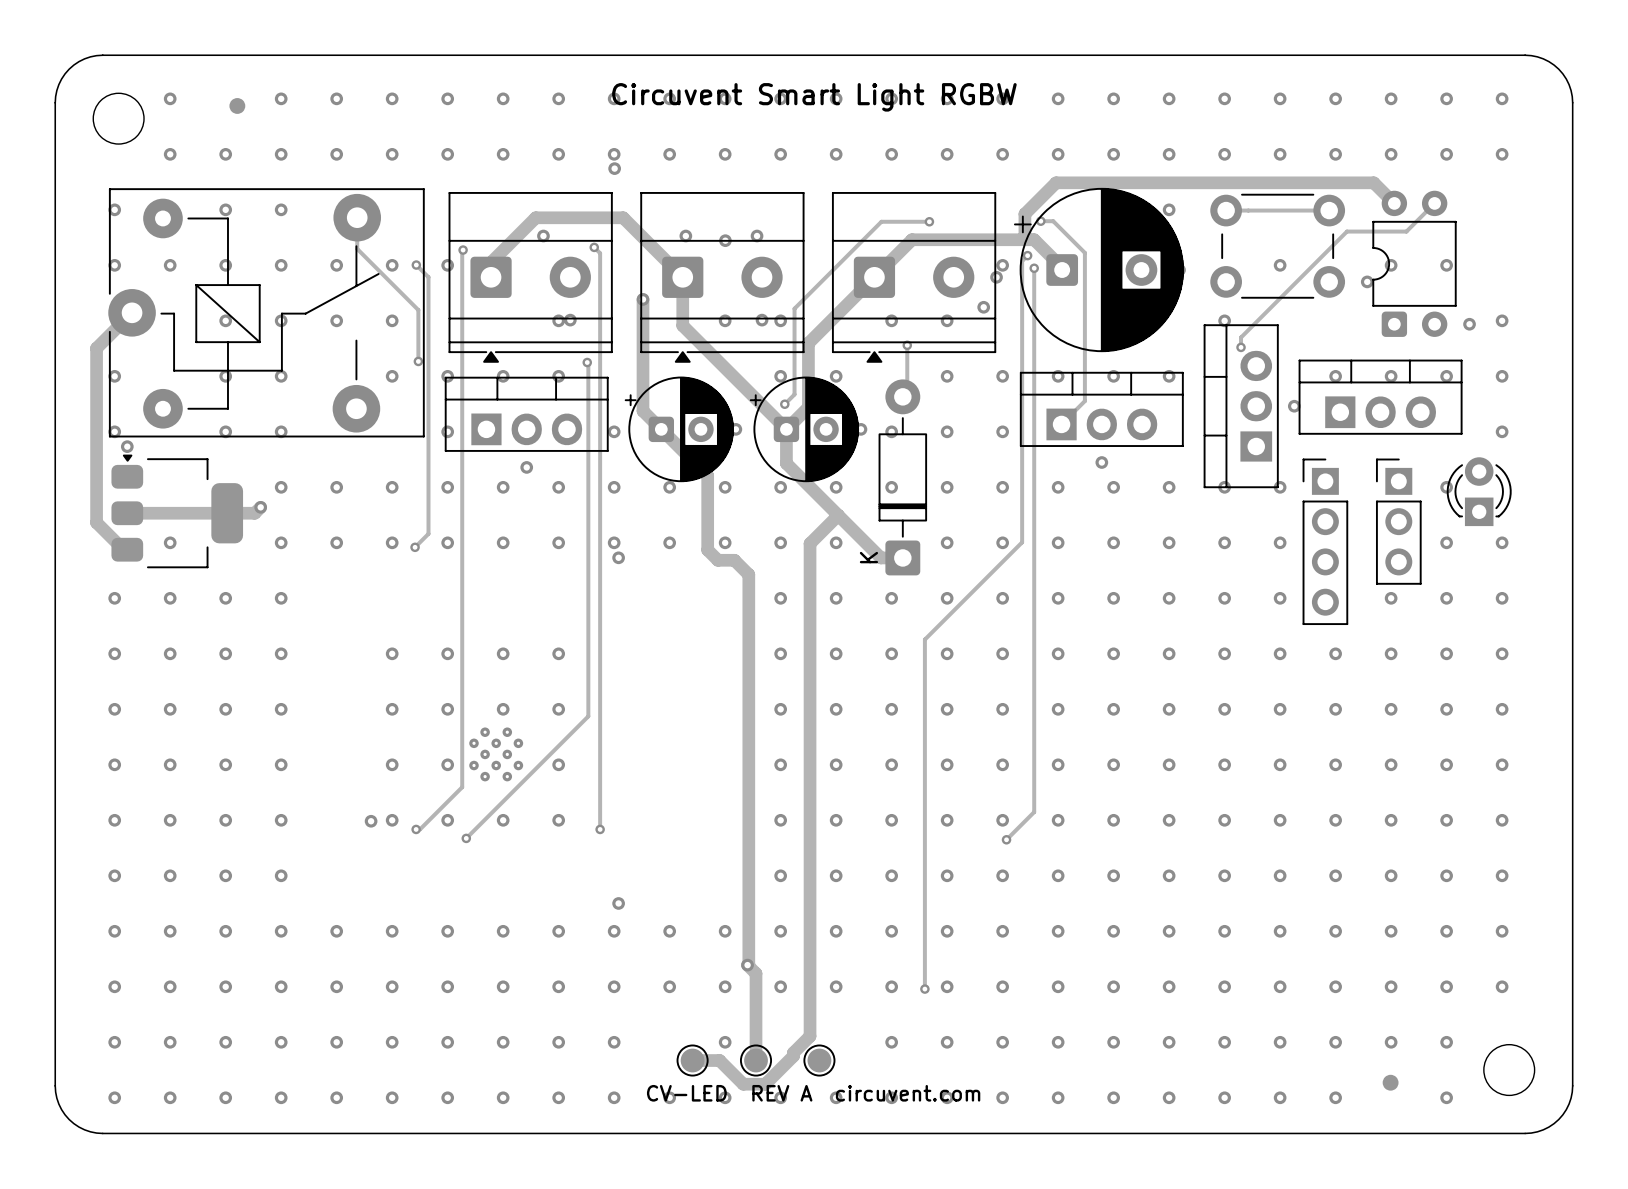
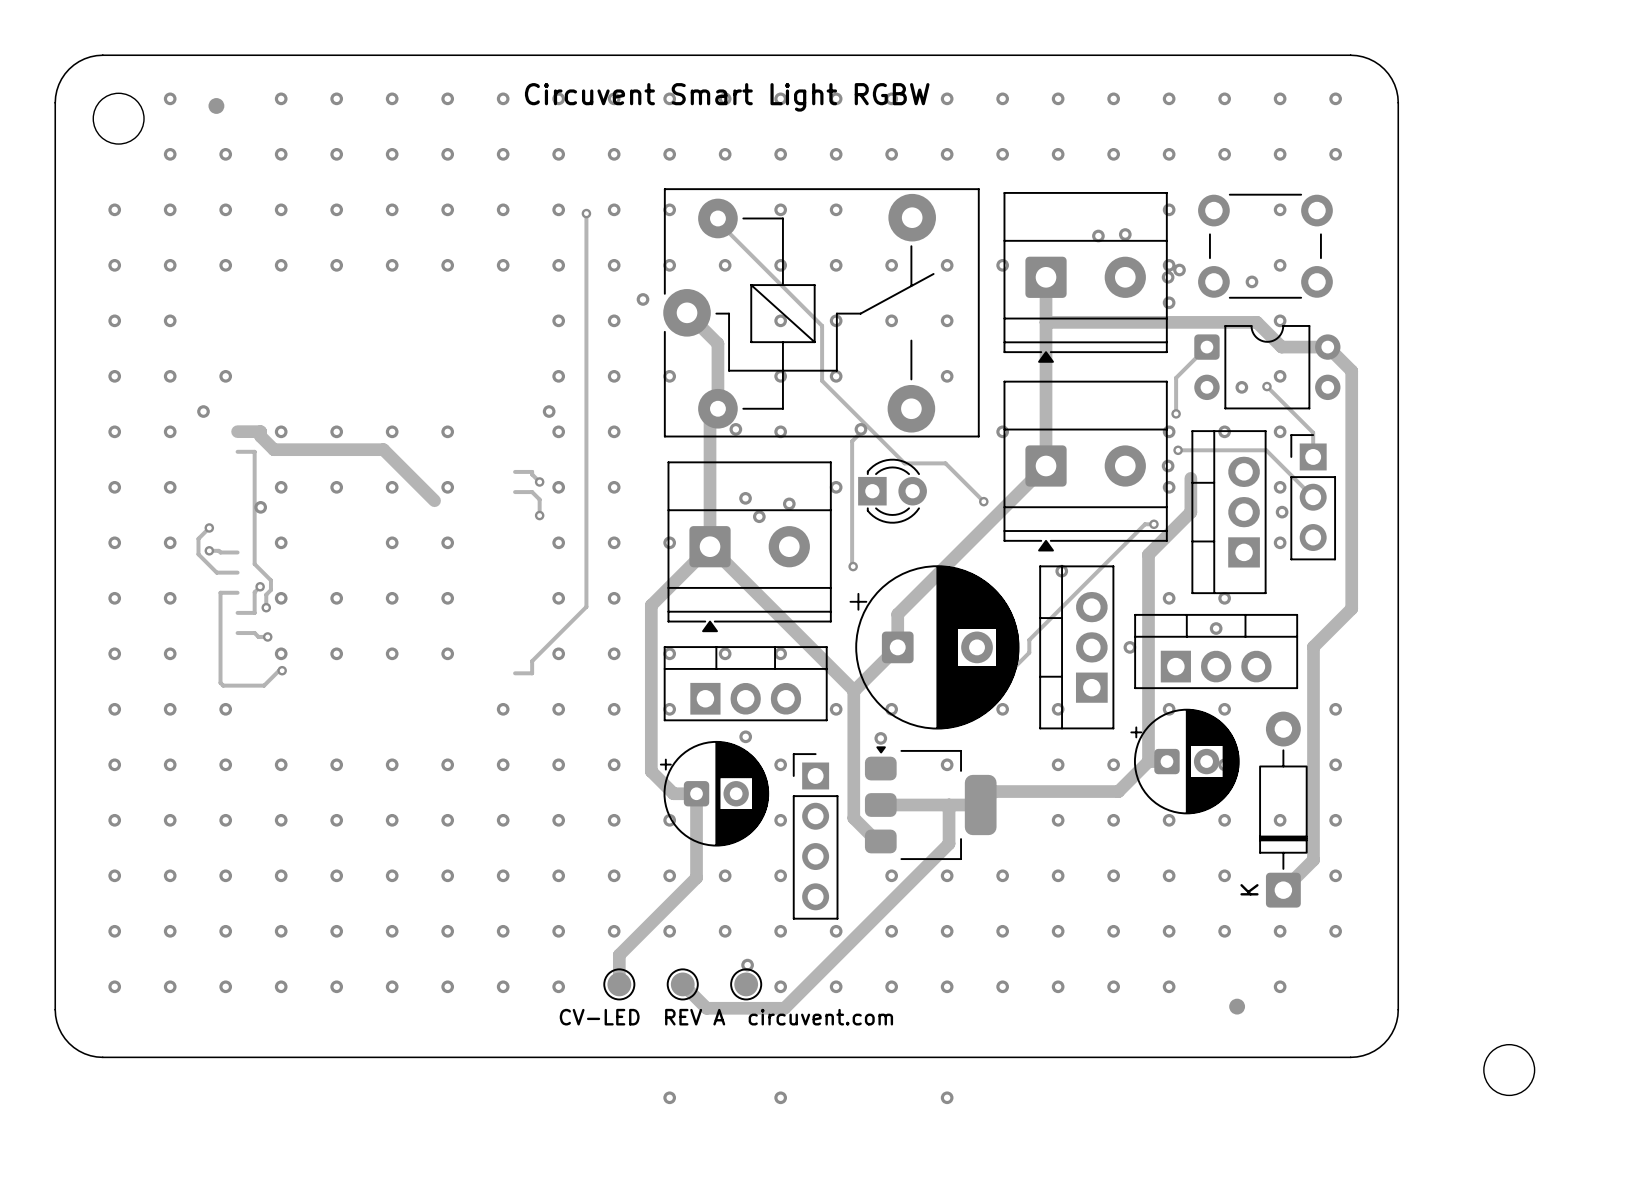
board edge: (1350, 55) (1531, 55) (1548, 61) (1558, 69) (1566, 79) (1572, 96) (1572, 1085) (1571, 1098) (1566, 1109) (1554, 1123) (1543, 1129) (1525, 1133) (96, 1133) (79, 1127) (69, 1119) (61, 1109) (56, 1098) (55, 1009) -> (1350, 55) (1368, 58) (1384, 69) (1394, 84) (1398, 102) (1398, 1009) (1396, 1022) (1391, 1033) (1379, 1047) (1368, 1053) (1350, 1057) (102, 1057) (84, 1053) (69, 1043) (58, 1027) (55, 1009)
text position: Circuvent Smart Light RGBW (814, 97) -> Circuvent Smart Light RGBW (727, 97)
via: (1391, 98) -> none
via: (1446, 98) -> none
via: (1502, 98) -> none
part position: (237, 105) -> (216, 105)
via: (1391, 154) -> none
via: (1446, 154) -> none
via: (1502, 154) -> none
via: (614, 168) -> none
part footprint: [1013, 187, 1184, 353] -> [1003, 192, 1168, 363]
track: (1394, 203) (1373, 182) (1056, 182) (1024, 213) (1024, 239) -> none
track: (1434, 203) (1406, 231) (1346, 231) (1241, 337) (1241, 347) -> none
via: none -> (170, 209)
via: none -> (336, 209)
via: none -> (392, 209)
via: none -> (447, 209)
via: none -> (503, 209)
via: none -> (558, 209)
via: none -> (614, 209)
via: none -> (669, 209)
via: none -> (780, 209)
via: none -> (836, 209)
via: none -> (1280, 209)
track: (1226, 210) (1329, 210) -> none
track: none -> (586, 213) (586, 606) (532, 661) (532, 673) (515, 673)
track: (357, 217) (357, 248) (418, 310) (418, 361) -> none
track: none -> (717, 218) (717, 221) (822, 325) (822, 380) (904, 463) (945, 463) (983, 501)
track: (929, 221) (881, 221) (794, 308) (794, 394) (784, 404) -> none
via: (929, 221) -> none
track: (1040, 221) (1053, 221) (1084, 252) (1084, 401) (1061, 424) -> none
via: (1040, 221) -> none
via: none -> (1125, 234)
via: (543, 236) -> none
via: (685, 236) -> none
via: (757, 236) -> none
via: none -> (1098, 236)
via: (725, 240) -> none
part position: (1277, 246) -> (1265, 246)
track: (594, 247) (600, 253) (600, 829) -> none
via position: (594, 247) -> (586, 213)
track: (463, 250) (462, 787) (419, 829) (416, 829) -> none
via: (463, 250) -> none
track: (1027, 255) (1022, 261) (1022, 542) (924, 639) (924, 989) -> none
via: (1027, 255) -> none
part rotation: 0° (1414, 263) -> 90° clockwise (1267, 367)
part position: (1414, 263) -> (1267, 367)
track: (416, 265) (428, 277) (428, 533) (415, 547) -> none
via: (416, 265) -> none
via: none -> (503, 265)
via: none -> (558, 265)
via: none -> (614, 265)
via: none -> (669, 265)
via: none -> (725, 265)
via: none -> (780, 265)
via: none -> (836, 265)
via: none -> (891, 265)
via: none -> (947, 265)
via: none -> (1169, 265)
via: (1391, 265) -> none
via: (1446, 265) -> none
track: (1034, 268) (1034, 812) (1006, 839) -> none
via: (1034, 268) -> none
track: (1062, 270) (1062, 267) (1034, 239) (912, 239) (808, 343) (808, 407) (786, 429) -> none
track: (491, 277) (491, 262) (535, 217) (623, 217) (682, 277) (682, 325) (786, 429) -> none
part: (530, 277) -> none
part: (722, 277) -> none
part: (914, 277) -> none
via: (996, 277) -> none
track: none -> (1046, 277) (1046, 465) (897, 614) (897, 647) (853, 691) (853, 818) (877, 841) (880, 841)
via: none -> (1168, 277)
via: none -> (1251, 281)
via: (1367, 281) -> none
track: (643, 299) (643, 411) (707, 475) (707, 550) (717, 560) (734, 560) (748, 574) (747, 965) (756, 973) (756, 1060) -> none
via: none -> (1169, 302)
via: (983, 307) -> none
track: (132, 312) (96, 348) (96, 522) (123, 549) (127, 549) -> none
part: (266, 312) -> none
track: none -> (687, 312) (717, 343) (717, 408) (710, 416) (710, 546)
part: none -> (821, 312)
via: none -> (114, 320)
via: none -> (170, 320)
via: (225, 320) -> none
via: (281, 320) -> none
via: (336, 320) -> none
via: (392, 320) -> none
via: (570, 320) -> none
via: none -> (614, 320)
via: (725, 320) -> none
via: (762, 320) -> none
via: none -> (836, 320)
via: (1224, 320) -> none
via: none -> (1280, 320)
via: (1502, 320) -> none
track: none -> (1046, 322) (1256, 322) (1281, 347) (1327, 347) (1351, 371) (1351, 608) (1313, 646) (1313, 860) (1283, 890)
via: (1469, 324) -> none
track: (907, 345) (907, 392) (902, 396) -> none
via: (907, 345) -> none
track: none -> (1206, 347) (1176, 377) (1176, 413)
via: (1241, 347) -> none
via: (418, 361) -> none
track: (587, 362) (588, 716) (466, 838) -> none
via: (587, 362) -> none
via: none -> (170, 376)
via: (281, 376) -> none
via: (392, 376) -> none
via: (447, 376) -> none
via: (503, 376) -> none
via: none -> (614, 376)
via: none -> (669, 376)
via: (1002, 376) -> none
via: (1058, 376) -> none
via: (1113, 376) -> none
via: (1169, 376) -> none
via: none -> (1280, 376)
via: (1335, 376) -> none
via: (1391, 376) -> none
via: (1446, 376) -> none
via: (1502, 376) -> none
track: none -> (1266, 386) (1313, 432) (1313, 456)
via: none -> (1266, 386)
via: none -> (1241, 387)
part: (1380, 397) -> none
via: (784, 404) -> none
part: (1241, 406) -> none
via: (1294, 406) -> none
part: (1101, 409) -> none
via: none -> (203, 411)
via: none -> (549, 411)
via: none -> (1176, 413)
part: (526, 414) -> none
part: (679, 429) -> none
track: (786, 429) (786, 463) (880, 557) (902, 557) -> none
part: (804, 429) -> none
via: none -> (170, 431)
via: (225, 431) -> none
track: none -> (237, 431) (260, 431) (260, 436) (273, 449) (383, 449) (434, 500)
via: none -> (336, 431)
via: none -> (392, 431)
via: none -> (558, 431)
via: none -> (780, 431)
via: (891, 431) -> none
via: (947, 431) -> none
via: none -> (1169, 431)
via: none -> (1224, 431)
via: none -> (1280, 431)
via: (1502, 431) -> none
track: none -> (859, 434) (852, 441) (853, 566)
via: (127, 446) -> none
track: none -> (1178, 450) (1266, 450) (1313, 497)
via: none -> (1178, 450)
track: none -> (237, 451) (254, 451) (254, 564) (270, 580) (270, 590) (266, 594) (266, 607)
via: (1101, 462) -> none
via: none -> (1168, 465)
part: none -> (1085, 466)
via: (526, 467) -> none
track: none -> (515, 471) (532, 471) (532, 474) (539, 481)
part: (902, 477) -> none
track: none -> (1190, 478) (1190, 512) (1148, 554) (1148, 761)
via: none -> (539, 481)
via: none -> (114, 487)
via: none -> (170, 487)
via: (503, 487) -> none
via: (669, 487) -> none
via: (725, 487) -> none
via: (780, 487) -> none
via: (891, 487) -> none
via: (947, 487) -> none
via: (1002, 487) -> none
via: (1058, 487) -> none
via: (1113, 487) -> none
via: (1224, 487) -> none
via: (1446, 487) -> none
part: none -> (892, 491)
part: (1479, 491) -> none
track: none -> (515, 492) (532, 492) (539, 499) (539, 515)
via: none -> (745, 498)
via: none -> (983, 501)
via: none -> (789, 503)
track: (260, 507) (254, 513) (127, 513) -> none
part: (177, 511) -> none
part: none -> (1228, 512)
via: none -> (1282, 512)
via: none -> (539, 515)
track: (838, 515) (810, 543) (810, 1036) (765, 1084) (743, 1084) (719, 1060) (692, 1060) -> none
via: none -> (759, 516)
part position: (1398, 521) -> (1313, 497)
track: none -> (1153, 524) (1144, 524) (1029, 639) (1029, 652) (1007, 674)
via: none -> (1153, 524)
track: none -> (209, 527) (198, 538) (198, 554) (216, 572) (237, 572)
via: none -> (209, 527)
part: (1325, 541) -> none
via: none -> (114, 542)
via: (336, 542) -> none
via: (503, 542) -> none
via: (725, 542) -> none
via: (780, 542) -> none
via: (836, 542) -> none
via: (947, 542) -> none
via: (1002, 542) -> none
via: (1058, 542) -> none
via: (1113, 542) -> none
via: (1169, 542) -> none
via: (1224, 542) -> none
via: (1446, 542) -> none
via: (1502, 542) -> none
track: none -> (710, 546) (651, 605) (651, 771) (673, 793) (696, 793) (696, 877) (619, 955) (619, 984)
track: none -> (710, 546) (854, 690)
part: none -> (749, 546)
via: (415, 547) -> none
track: none -> (209, 550) (237, 552)
via: none -> (209, 550)
via: (618, 557) -> none
via: none -> (853, 566)
via: none -> (1061, 571)
track: none -> (260, 586) (254, 592) (254, 612) (237, 612)
via: none -> (260, 586)
track: none -> (237, 592) (220, 592) (220, 682) (223, 685) (264, 685) (279, 670) (282, 670)
via: (225, 598) -> none
via: none -> (336, 598)
via: none -> (392, 598)
via: none -> (447, 598)
via: none -> (558, 598)
via: none -> (614, 598)
via: (780, 598) -> none
via: (836, 598) -> none
via: (891, 598) -> none
via: (947, 598) -> none
via: (1002, 598) -> none
via: (1058, 598) -> none
via: (1113, 598) -> none
via: (1280, 598) -> none
via: (1391, 598) -> none
via: (1446, 598) -> none
via: (1502, 598) -> none
via: none -> (266, 607)
via: none -> (1216, 628)
track: none -> (237, 633) (254, 633) (258, 636) (267, 636)
via: none -> (267, 636)
part: none -> (934, 647)
part: none -> (1076, 647)
part: none -> (1216, 651)
via: (225, 653) -> none
via: none -> (336, 653)
via: (503, 653) -> none
via: none -> (614, 653)
via: none -> (669, 653)
via: none -> (725, 653)
via: (836, 653) -> none
via: (891, 653) -> none
via: (947, 653) -> none
via: (1058, 653) -> none
via position: (1113, 653) -> (1129, 647)
via: (1169, 653) -> none
via: (1224, 653) -> none
via: (1280, 653) -> none
via: (1335, 653) -> none
via: (1391, 653) -> none
via: (1446, 653) -> none
via: (1502, 653) -> none
via: none -> (282, 670)
part: none -> (745, 683)
via: (281, 709) -> none
via: (392, 709) -> none
via: (447, 709) -> none
via: none -> (614, 709)
via: none -> (669, 709)
via: (780, 709) -> none
via: (1113, 709) -> none
via: (1280, 709) -> none
via: (1391, 709) -> none
via: (1446, 709) -> none
via: (1502, 709) -> none
via: none -> (745, 736)
via: none -> (880, 738)
part: (496, 754) -> none
track: none -> (1148, 761) (1118, 791) (994, 791) (980, 805) (880, 805)
part: none -> (1184, 761)
via: none -> (336, 764)
via: none -> (503, 764)
via: none -> (614, 764)
via: (836, 764) -> none
via: (891, 764) -> none
via: (1002, 764) -> none
via: (1169, 764) -> none
via: (1280, 764) -> none
via: (1391, 764) -> none
via: (1446, 764) -> none
via: (1502, 764) -> none
part: none -> (714, 793)
part: none -> (930, 803)
track: none -> (949, 805) (949, 843) (784, 1008) (706, 1008) (682, 984)
part: none -> (1283, 809)
via: none -> (336, 820)
via: none -> (614, 820)
via: none -> (669, 820)
via: (836, 820) -> none
via: (891, 820) -> none
via: (947, 820) -> none
via: (1002, 820) -> none
via: (1391, 820) -> none
via: (1446, 820) -> none
via: (1502, 820) -> none
via: (371, 821) -> none
via: (416, 829) -> none
via: (600, 829) -> none
part: none -> (815, 836)
via: (466, 838) -> none
via: (1006, 839) -> none
via: none -> (336, 875)
via: none -> (392, 875)
via: none -> (447, 875)
via: none -> (503, 875)
via: none -> (558, 875)
via: none -> (669, 875)
via: none -> (725, 875)
via: (836, 875) -> none
via: (1280, 875) -> none
via: (1391, 875) -> none
via: (1446, 875) -> none
via: (1502, 875) -> none
via position: (618, 903) -> (614, 875)
via: (1391, 931) -> none
via: (1446, 931) -> none
via: (1502, 931) -> none
part: none -> (619, 984)
part: none -> (682, 984)
part: none -> (746, 984)
via: (614, 986) -> none
via: (669, 986) -> none
via: (725, 986) -> none
via: (1224, 986) -> none
via: (1335, 986) -> none
via: (1391, 986) -> none
via: (1446, 986) -> none
via: (1502, 986) -> none
via: (924, 989) -> none
via: (114, 1042) -> none
via: (170, 1042) -> none
via: (225, 1042) -> none
via: (281, 1042) -> none
via: (336, 1042) -> none
via: (392, 1042) -> none
via: (447, 1042) -> none
via: (503, 1042) -> none
via: (558, 1042) -> none
via: (614, 1042) -> none
via: (725, 1042) -> none
via: (891, 1042) -> none
via: (947, 1042) -> none
via: (1002, 1042) -> none
via: (1058, 1042) -> none
via: (1113, 1042) -> none
via: (1169, 1042) -> none
via: (1224, 1042) -> none
via: (1280, 1042) -> none
via: (1335, 1042) -> none
via: (1391, 1042) -> none
via: (1446, 1042) -> none
part: (692, 1060) -> none
part: (756, 1060) -> none
part: (819, 1060) -> none
part position: (1390, 1082) -> (1237, 1006)
text position: CV-LED REV A circuvent.com (813, 1093) -> CV-LED REV A circuvent.com (726, 1017)
via: (114, 1097) -> none
via: (170, 1097) -> none
via: (225, 1097) -> none
via: (281, 1097) -> none
via: (336, 1097) -> none
via: (392, 1097) -> none
via: (447, 1097) -> none
via: (503, 1097) -> none
via: (558, 1097) -> none
via: (614, 1097) -> none
via: (725, 1097) -> none
via: (836, 1097) -> none
via: (891, 1097) -> none
via: (1002, 1097) -> none
via: (1058, 1097) -> none
via: (1113, 1097) -> none
via: (1169, 1097) -> none
via: (1224, 1097) -> none
via: (1280, 1097) -> none
via: (1335, 1097) -> none
via: (1446, 1097) -> none

